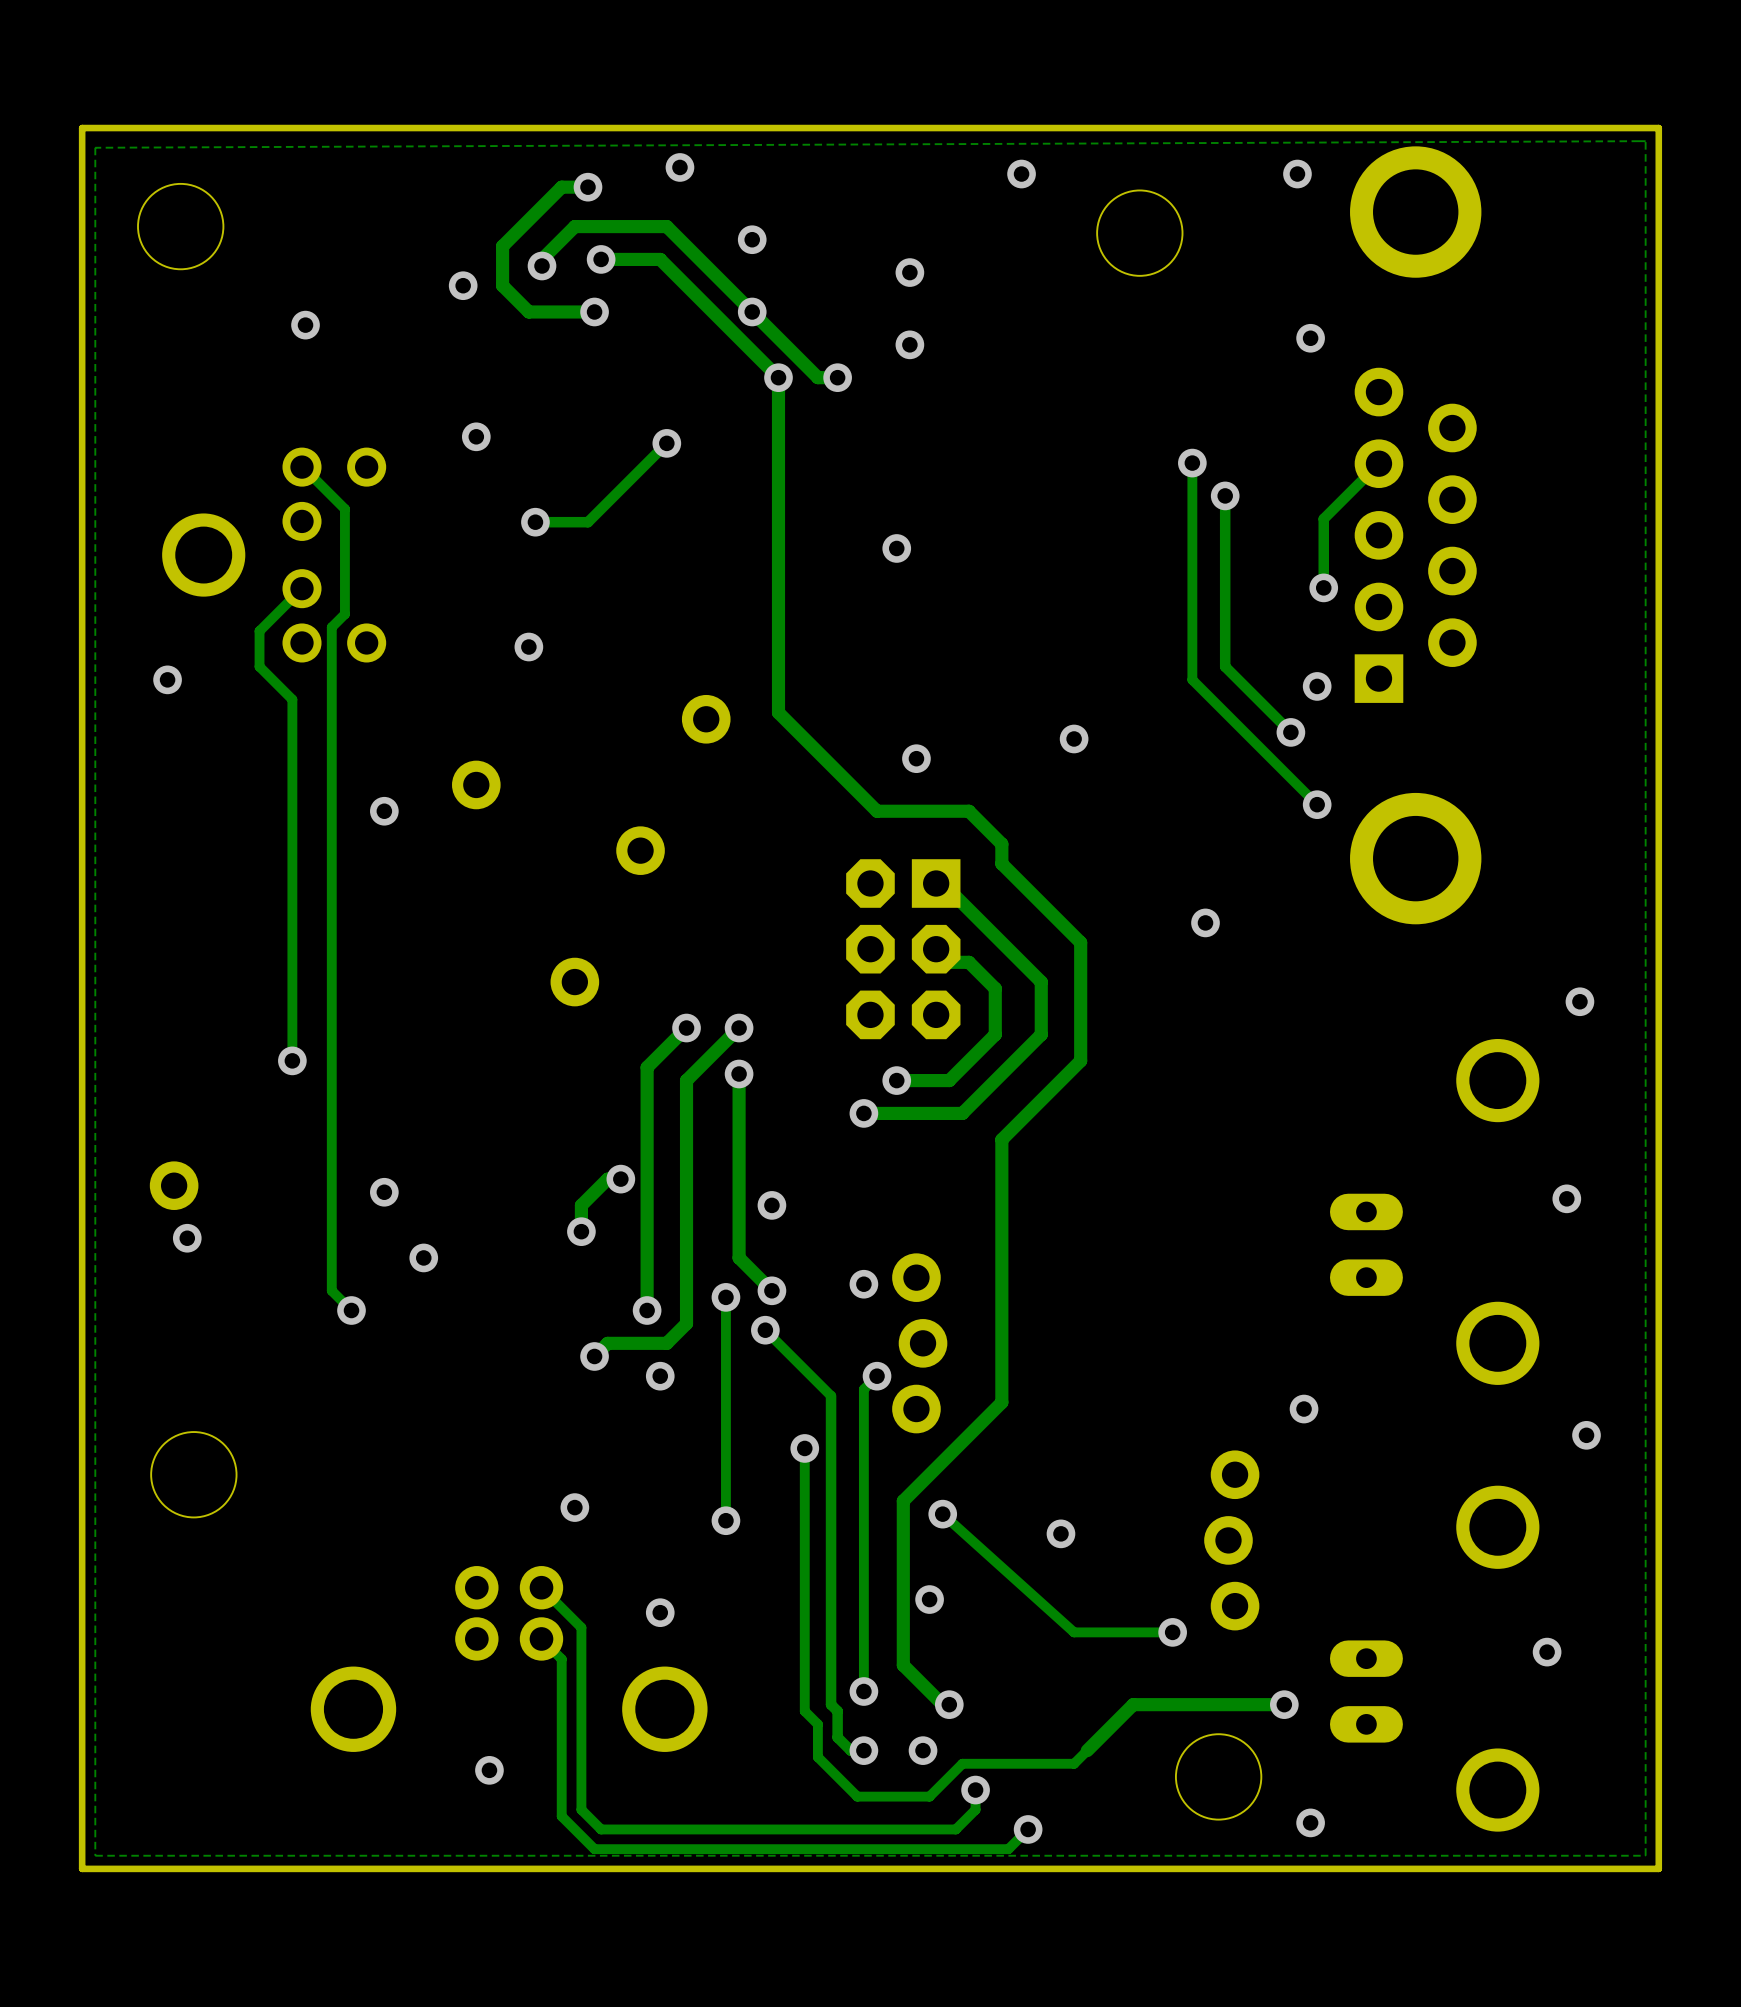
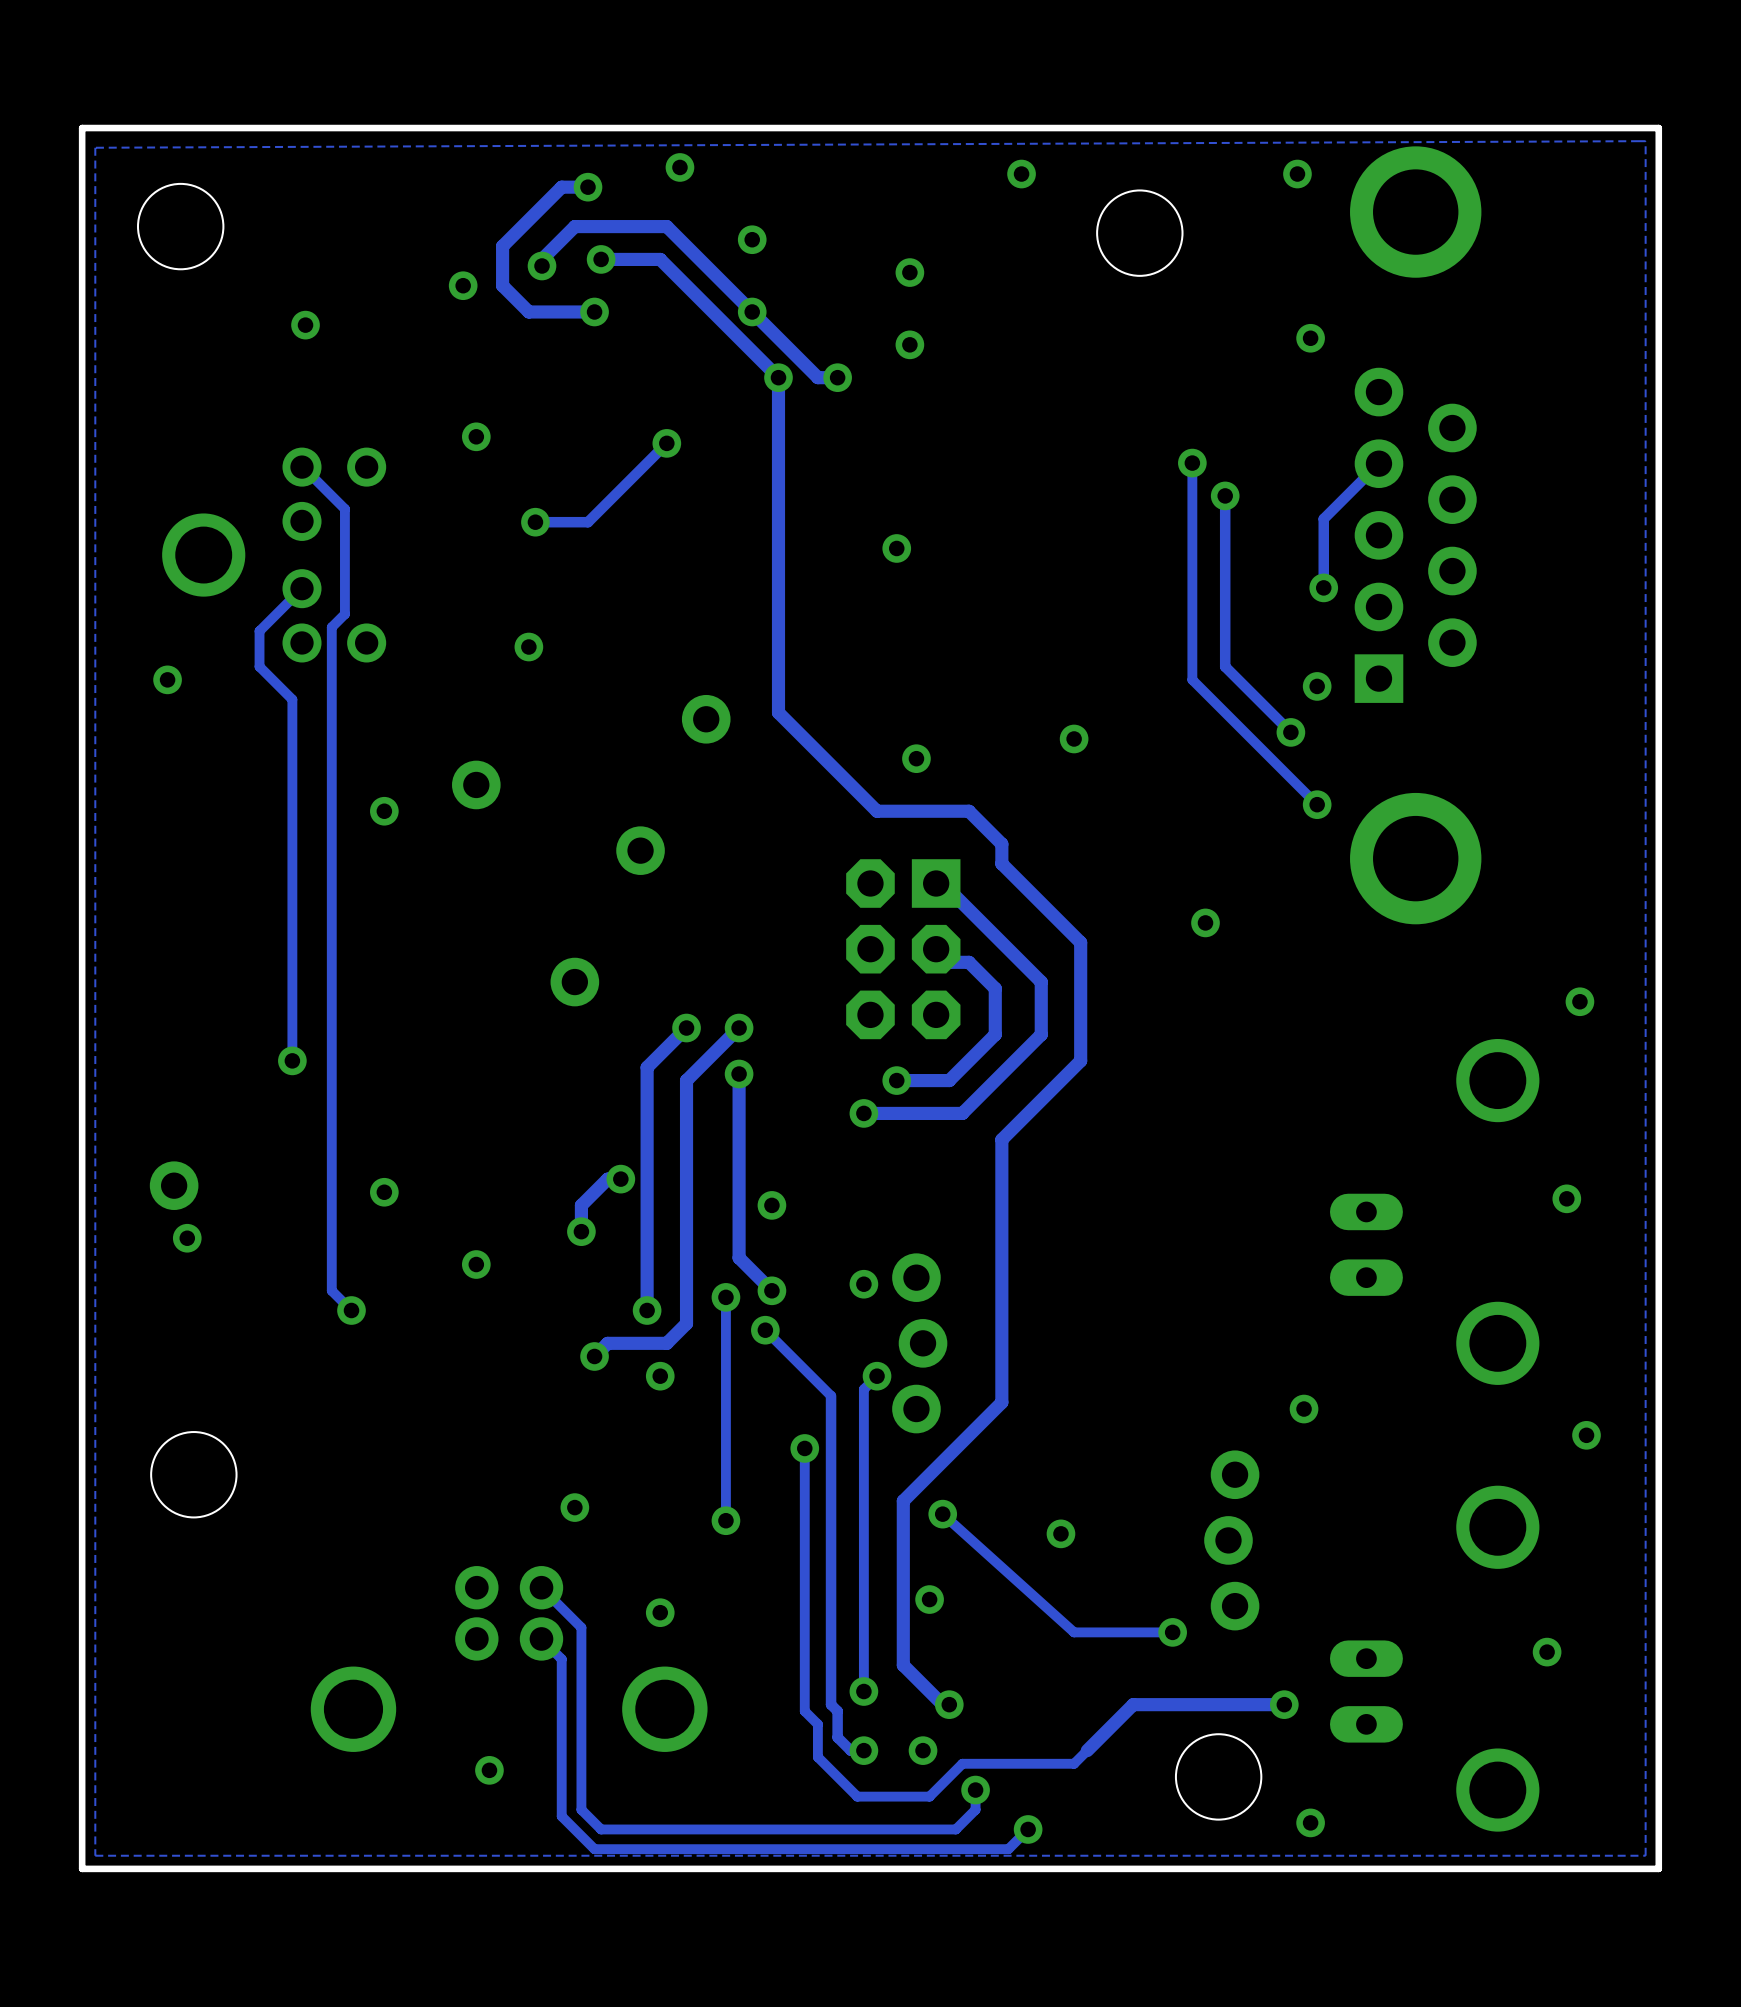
via position: (423, 1257) -> (476, 1264)

